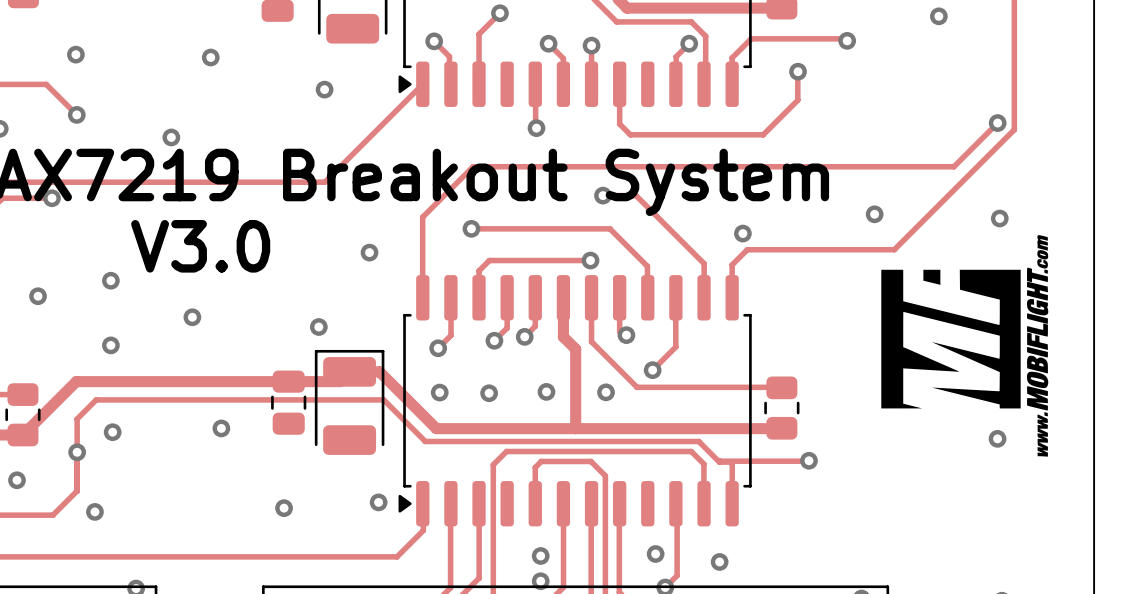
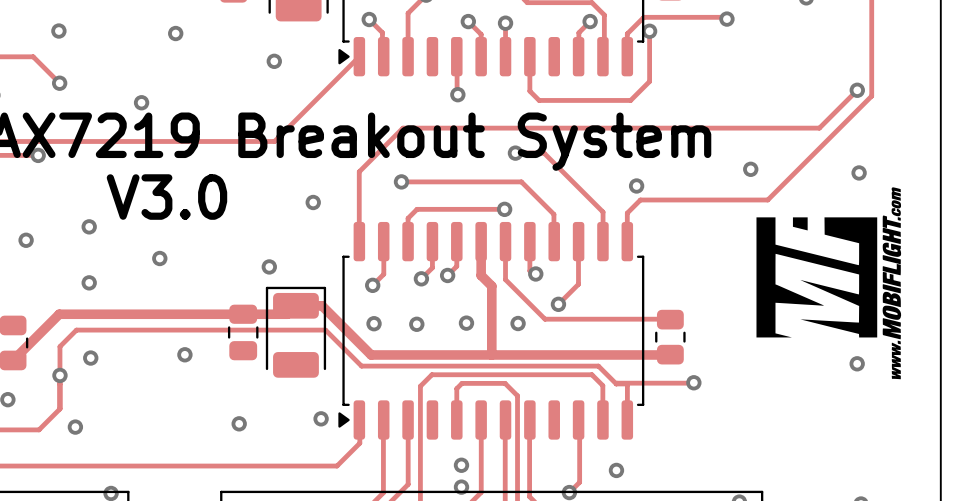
track: (797, 71) (797, 100) (763, 134) (736, 134) -> (649, 31) (649, 81) (630, 100)
via position: (798, 71) -> (649, 31)
via: (655, 553) -> none

